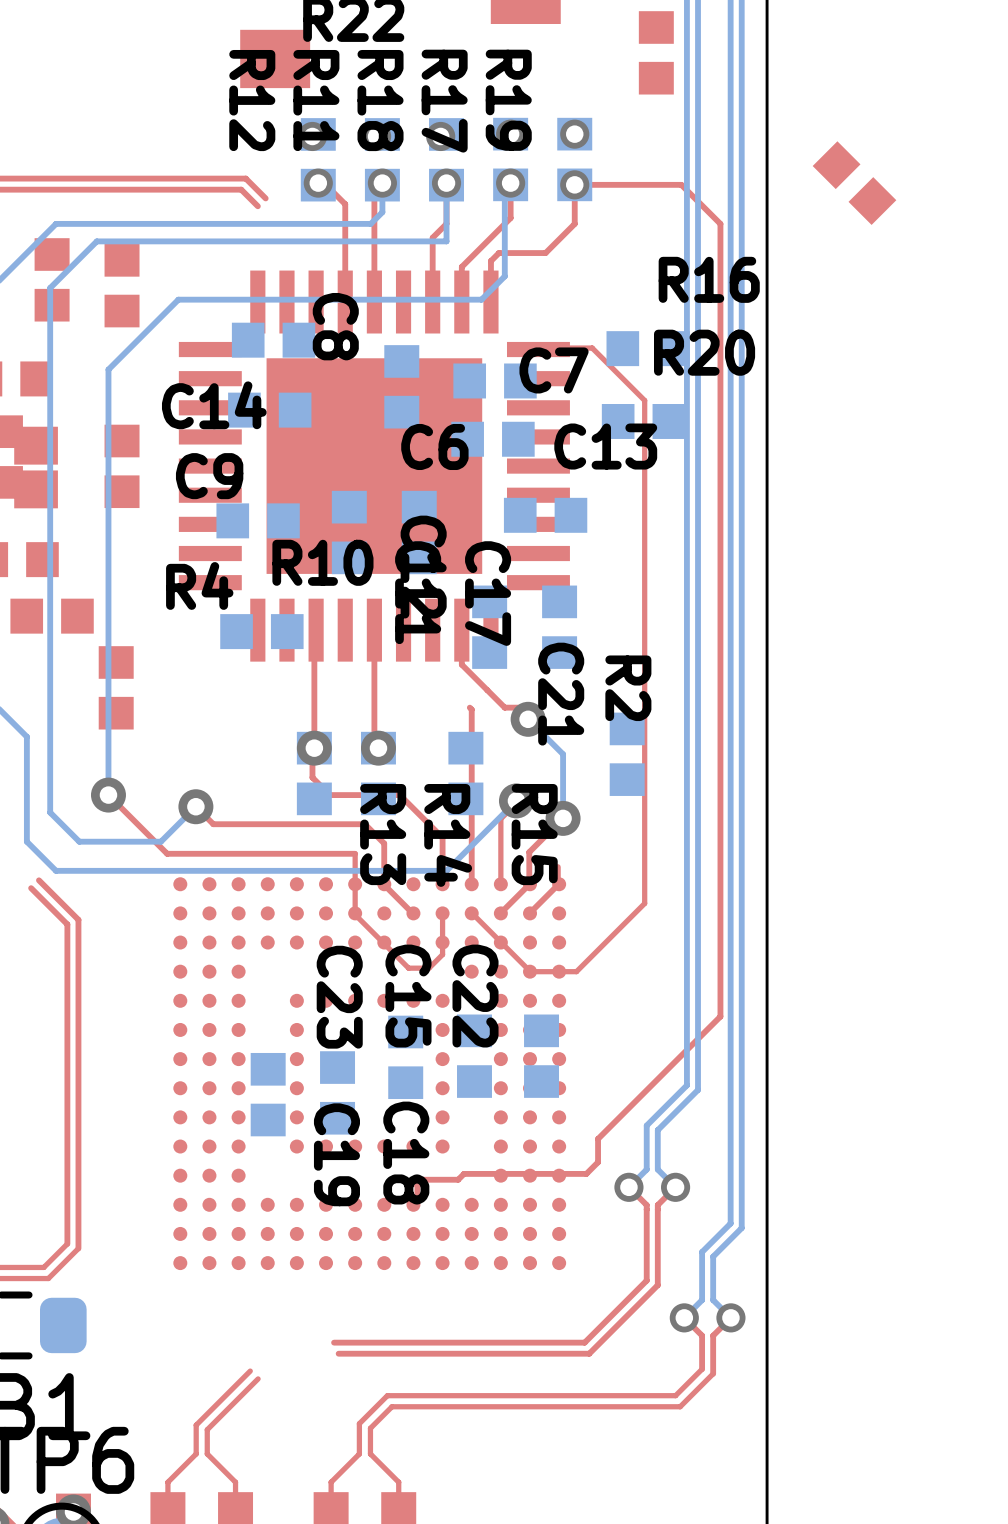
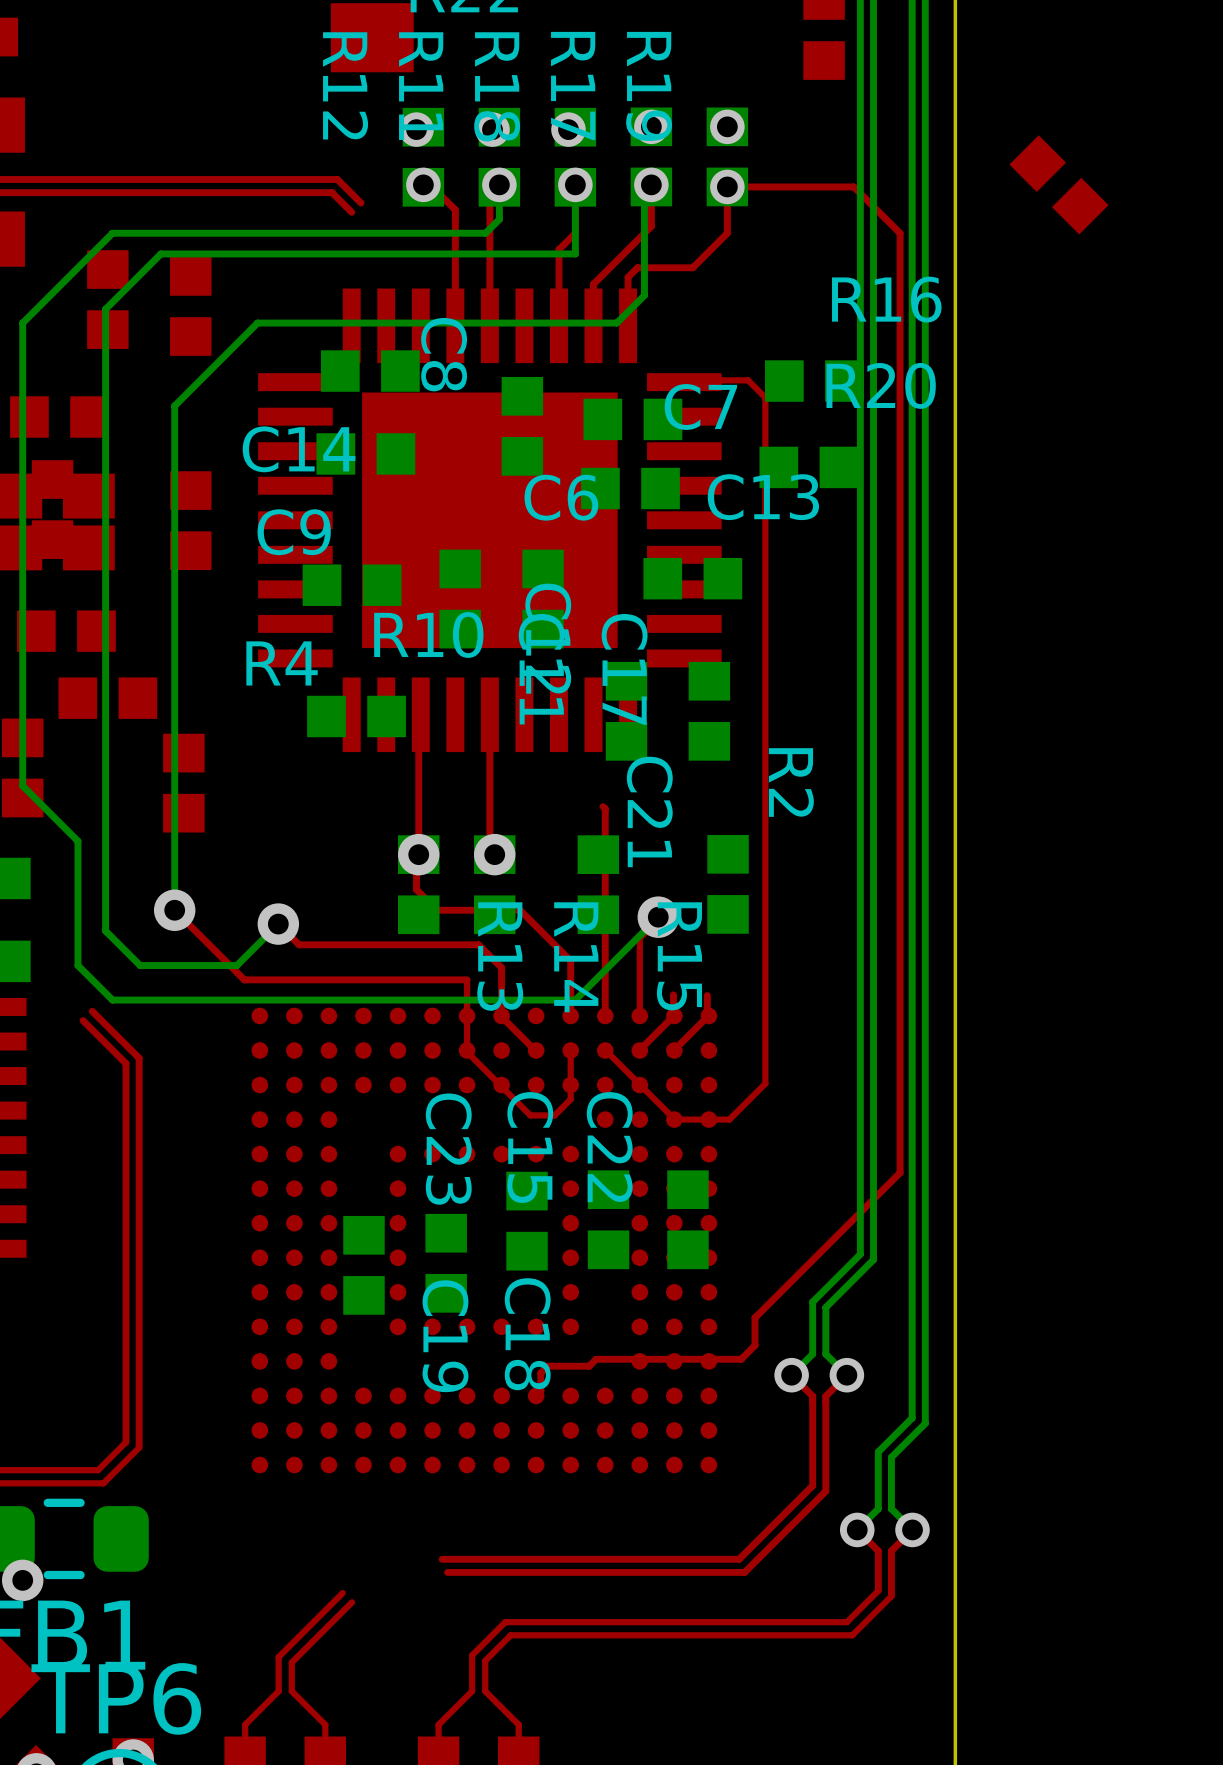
top track: (606, 362) (644, 400) (644, 903) (606, 941) -> (765, 397) (765, 1083)
top track: (461, 630) (461, 664) (504, 707) (522, 707) (522, 713) (528, 719) -> none
bottom track: (528, 719) (563, 754) (563, 818) -> none
via: (528, 719) -> none
C21 position: (627, 754) -> (728, 884)
top track: (563, 818) (529, 852) (529, 866) -> none
via: (563, 818) -> none

